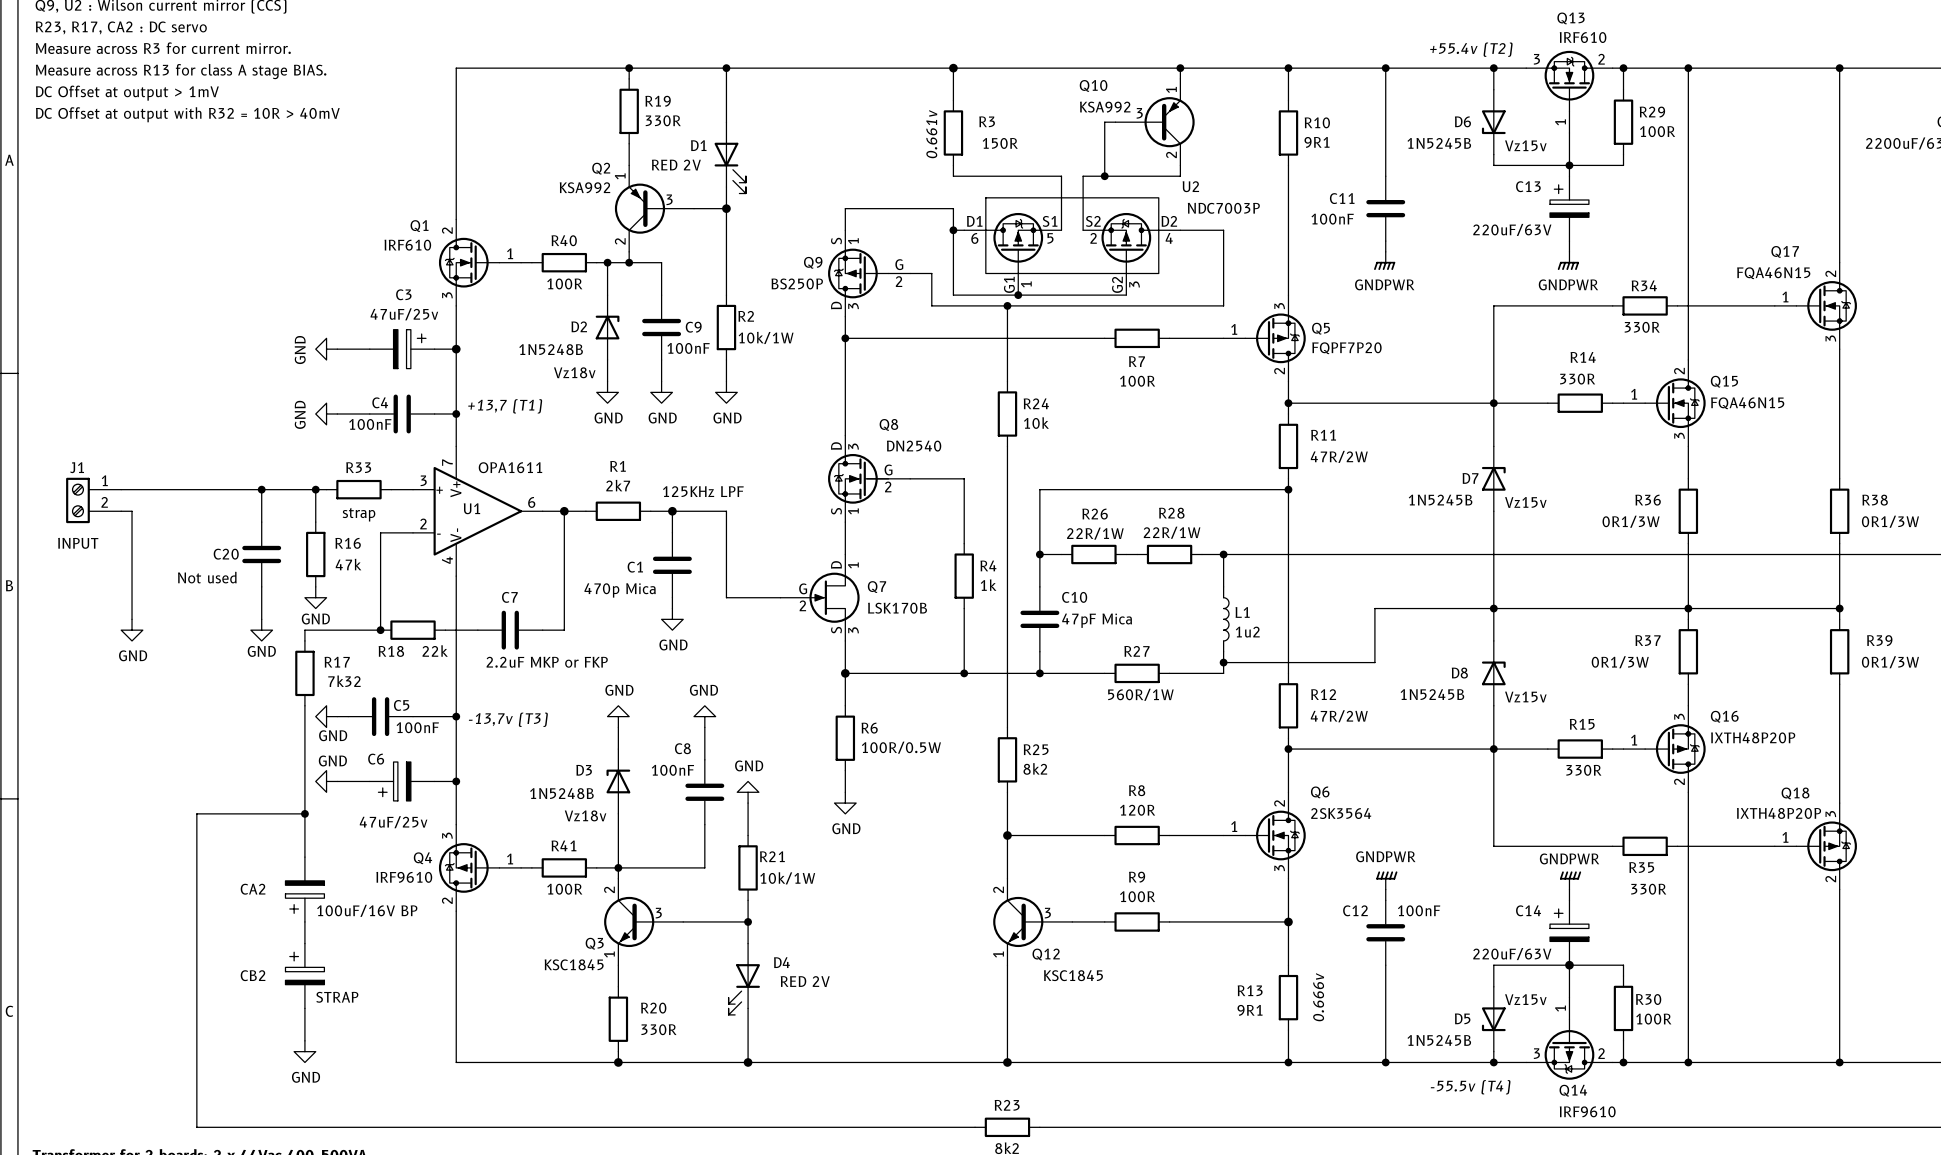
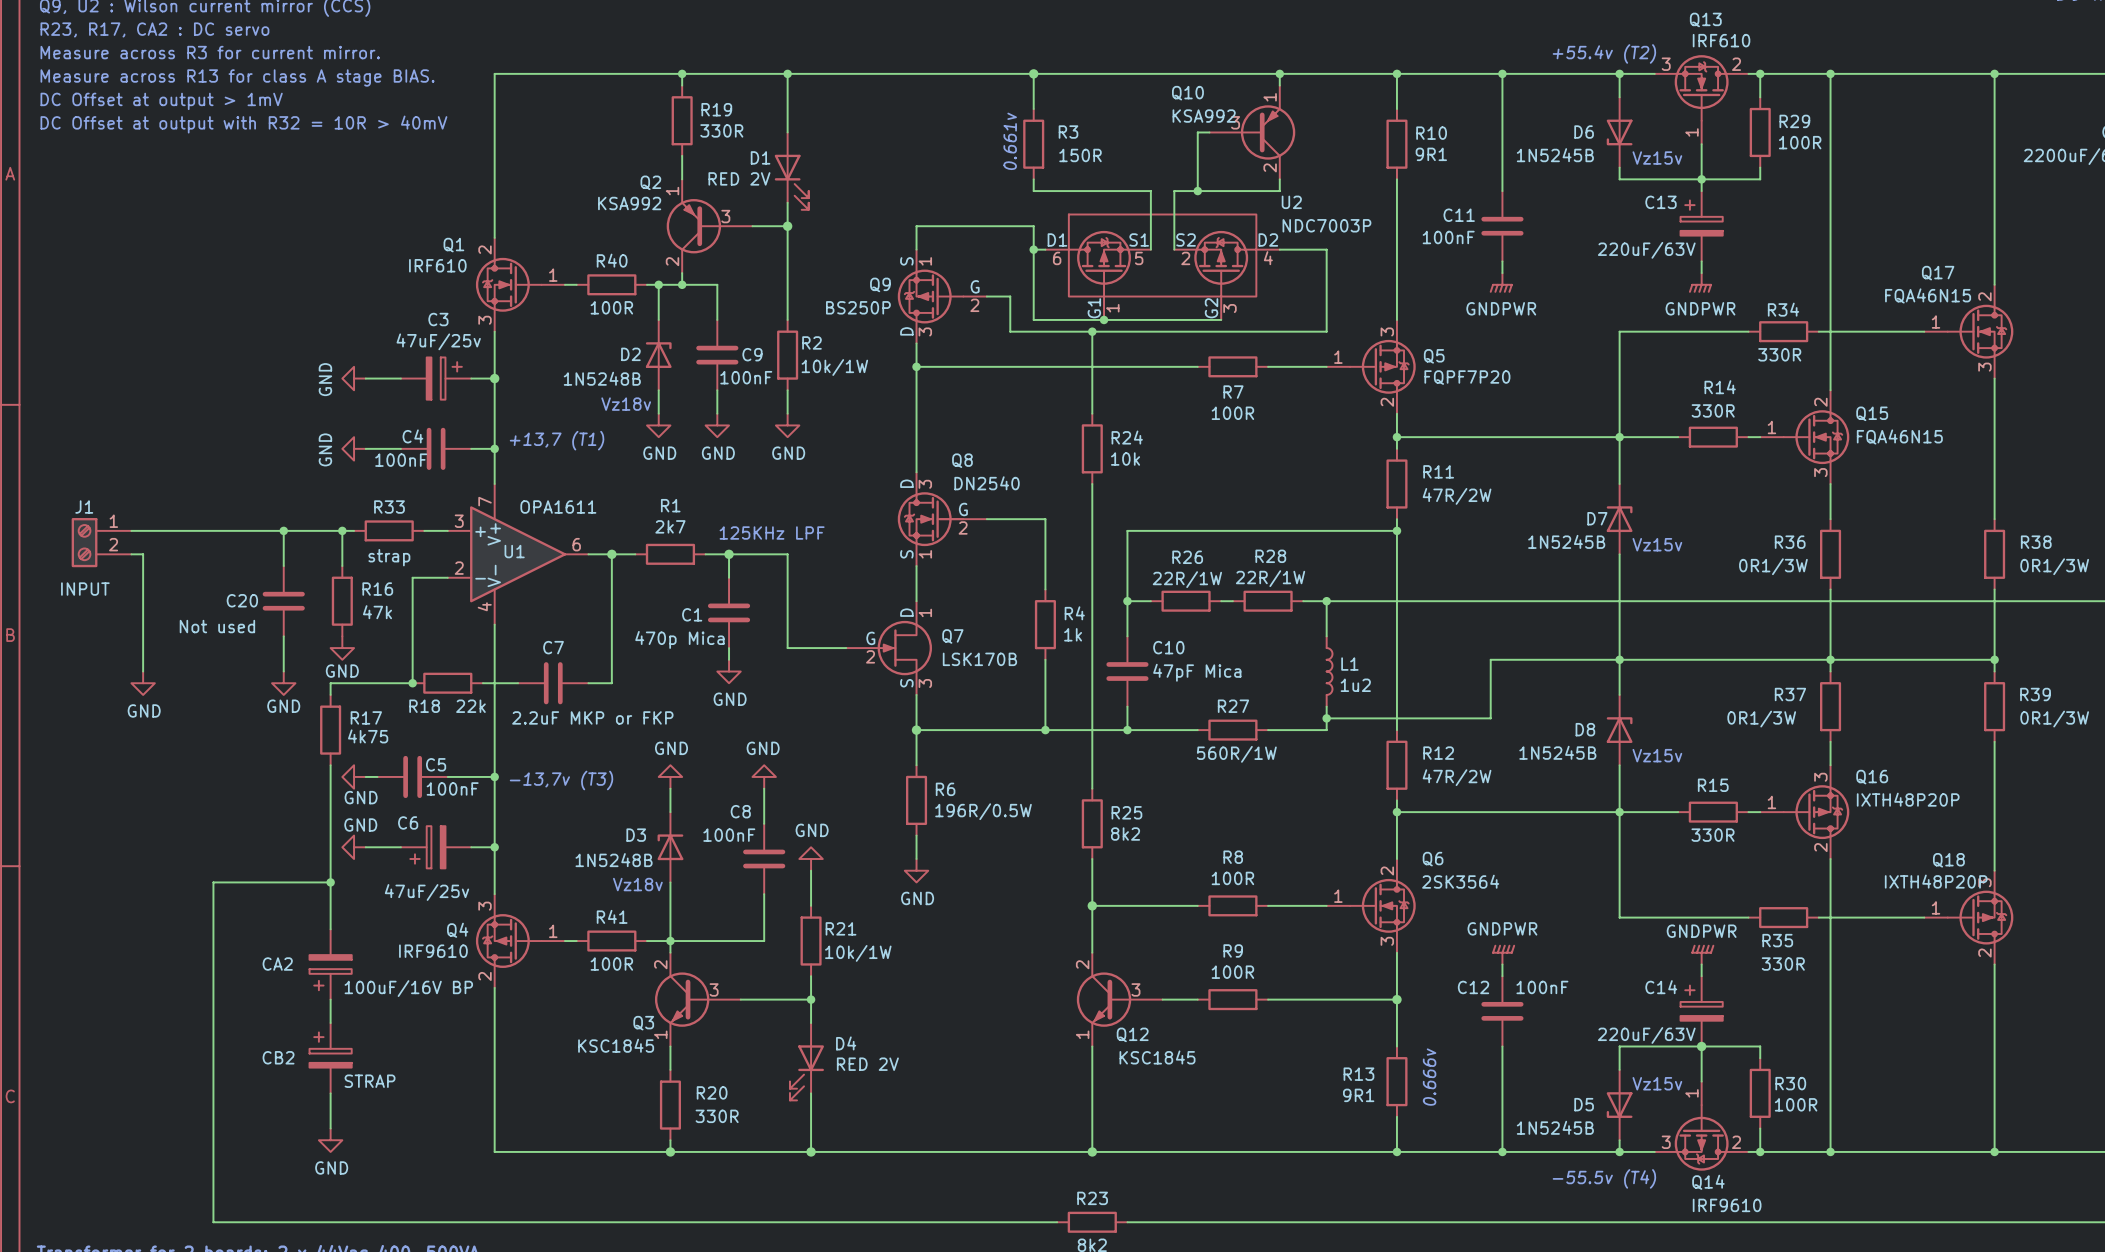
R17 value: 7k32 (344, 681) -> 4k75 (368, 736)
R6 value: 100R/0.5W (901, 747) -> 196R/0.5W (983, 811)
R8 value: 120R (1137, 810) -> 100R (1232, 878)

